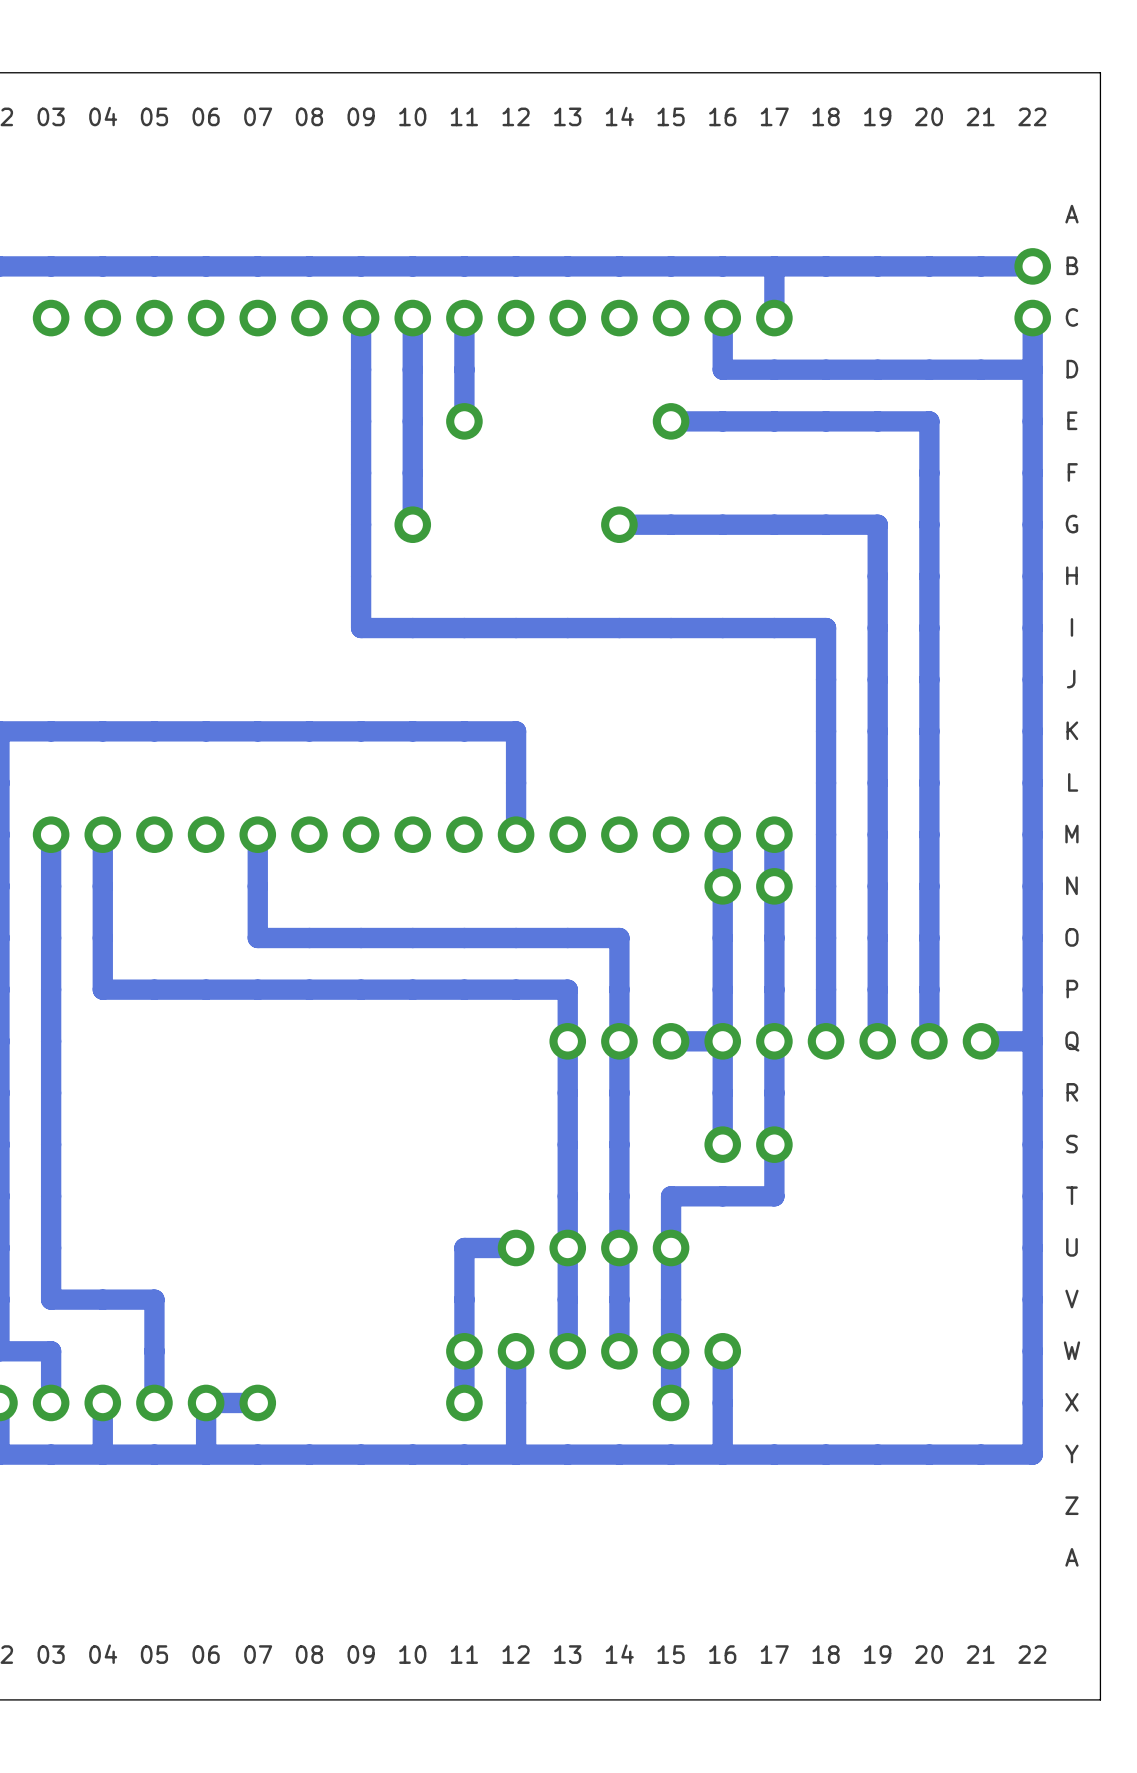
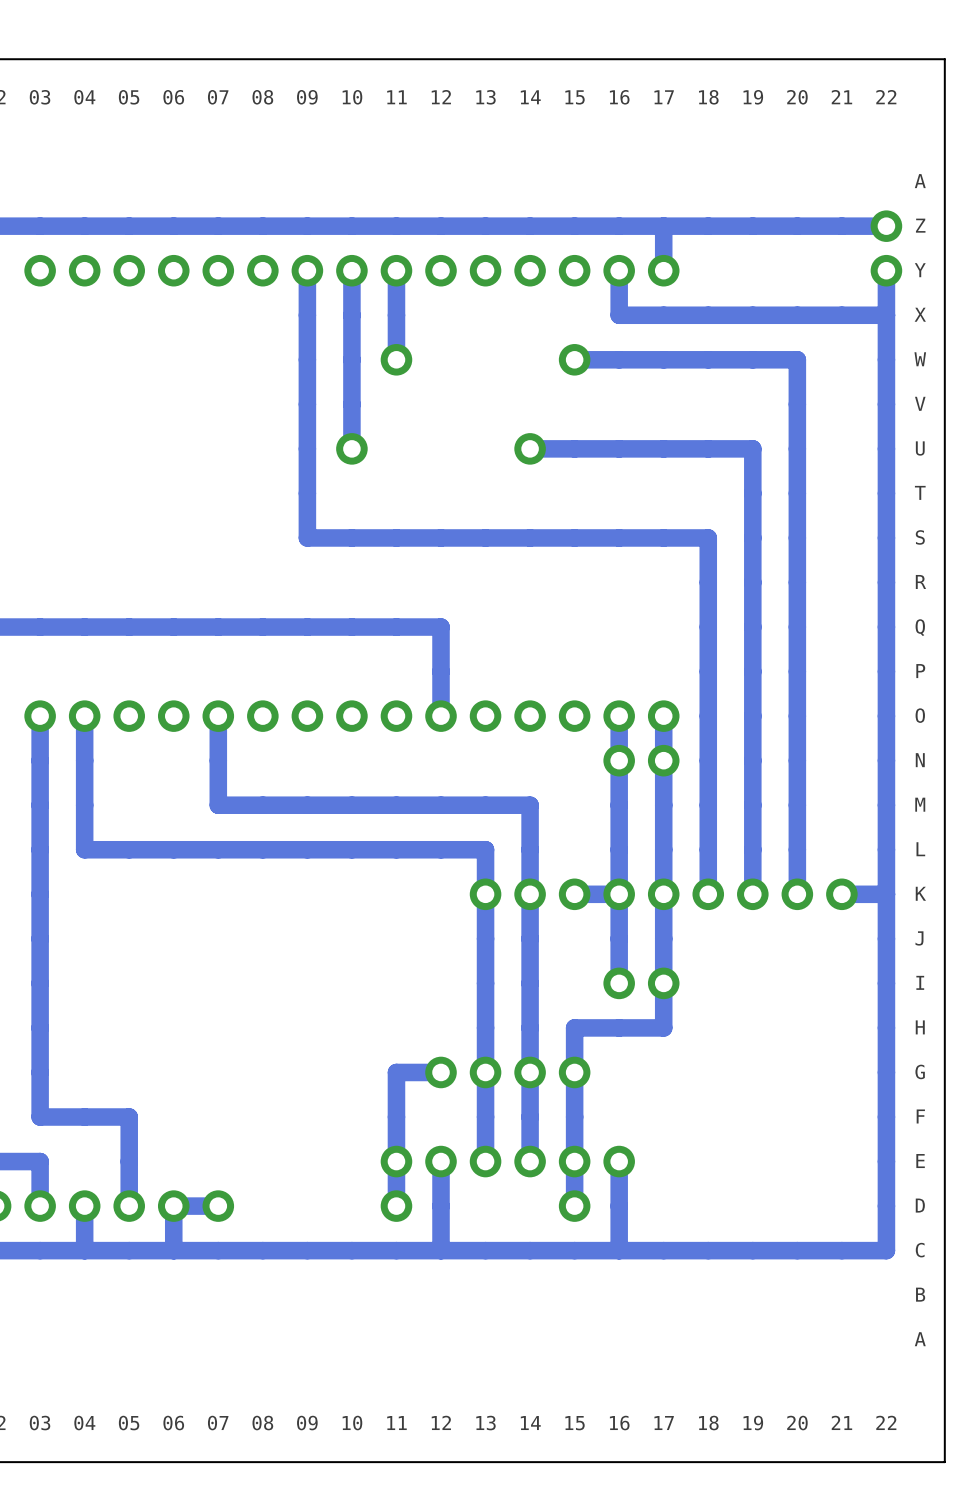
text: B (1072, 265) -> Z (920, 225)
text: C (1071, 317) -> Y (920, 270)
text: D (1072, 369) -> X (920, 314)
text: E (1072, 420) -> W (920, 359)
text: F (1072, 472) -> V (920, 403)
text: G (1071, 524) -> U (920, 448)
text: H (1071, 575) -> T (920, 492)
text: I (1071, 627) -> S (920, 537)
text: J (1071, 679) -> R (920, 581)
text: K (1072, 730) -> Q (920, 627)
text: L (1073, 782) -> P (920, 671)
text: M (1071, 834) -> O (920, 715)
text: O (1071, 937) -> M (920, 804)
text: P (1072, 989) -> L (920, 849)
text: Q (1072, 1041) -> K (920, 893)
text: R (1072, 1092) -> J (919, 938)
text: S (1071, 1144) -> I (920, 982)
text: T (1071, 1195) -> H (920, 1027)
text: U (1071, 1247) -> G (920, 1071)
text: V (1071, 1299) -> F (920, 1116)
text: W (1071, 1350) -> E (920, 1161)
text: X (1071, 1402) -> D (920, 1205)
text: Y (1071, 1454) -> C (920, 1250)
text: Z (1071, 1505) -> B (920, 1294)

